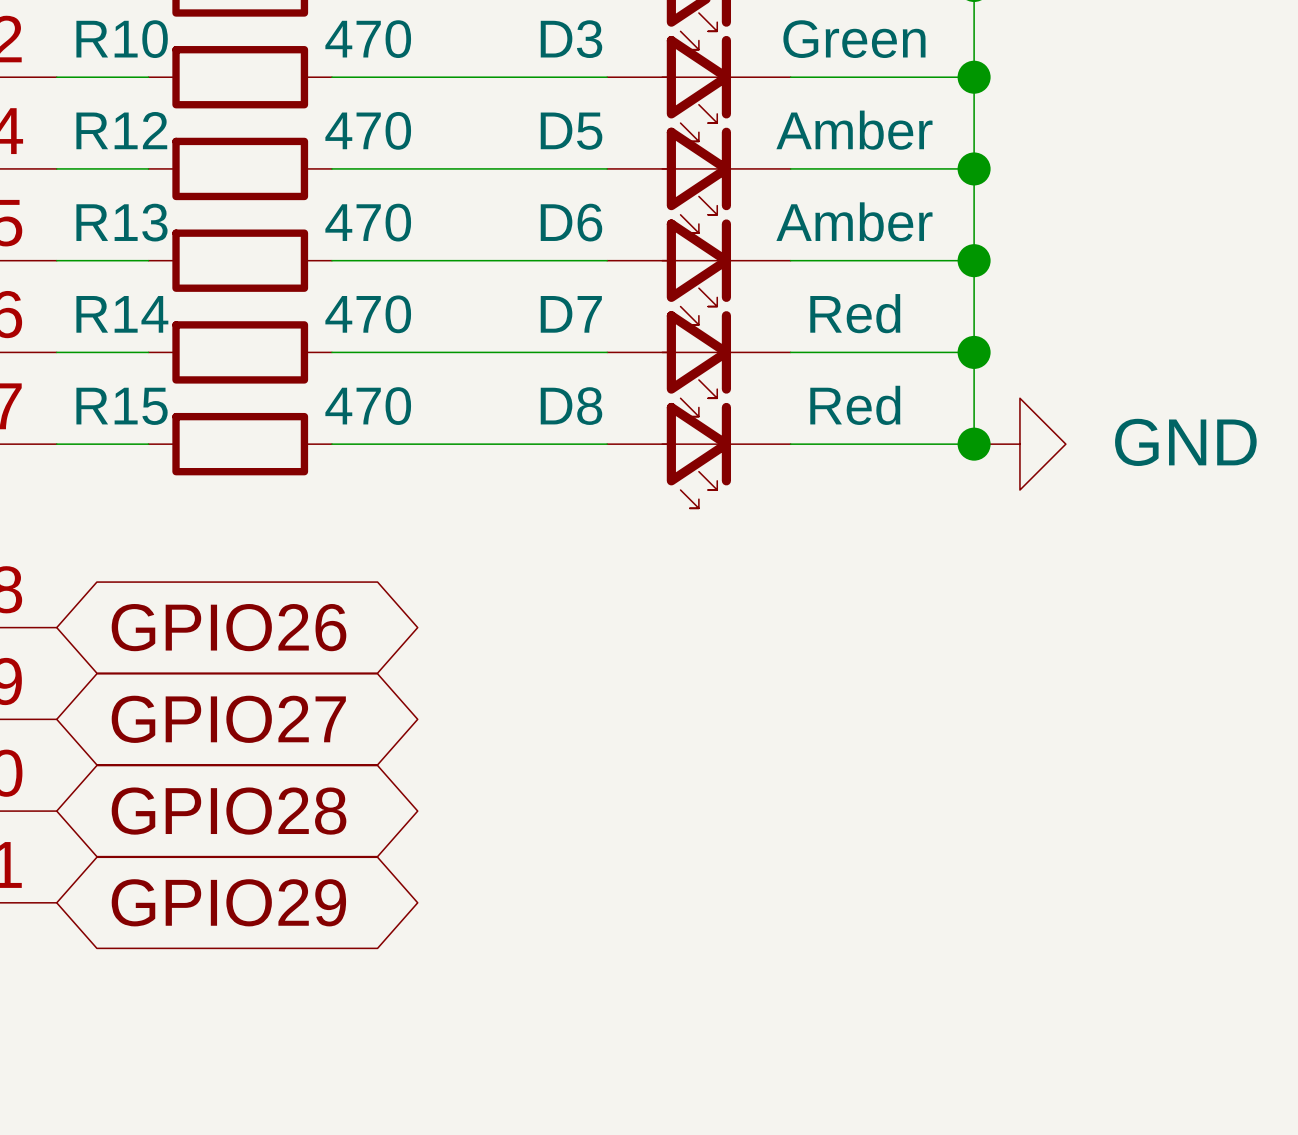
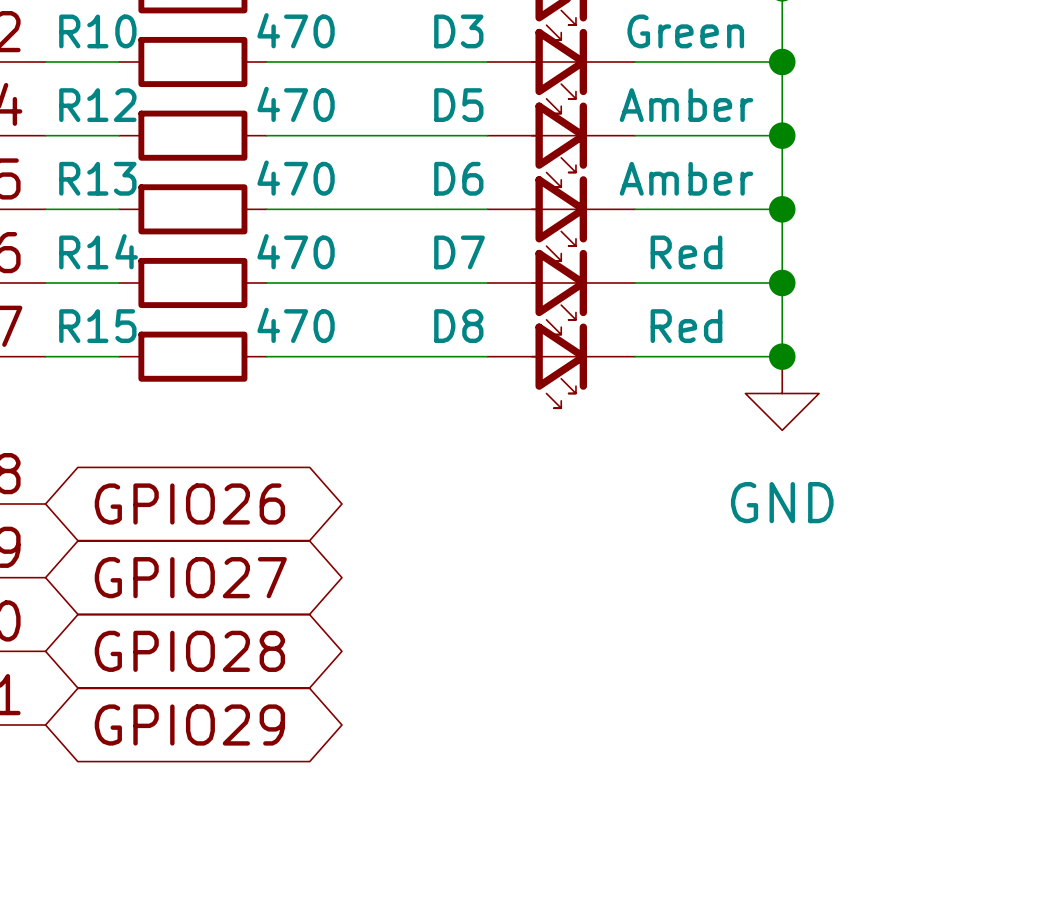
power symbol rotation: 0° (1019, 444) -> 90° clockwise (782, 393)
power symbol position: GND (1019, 444) -> GND (782, 393)

